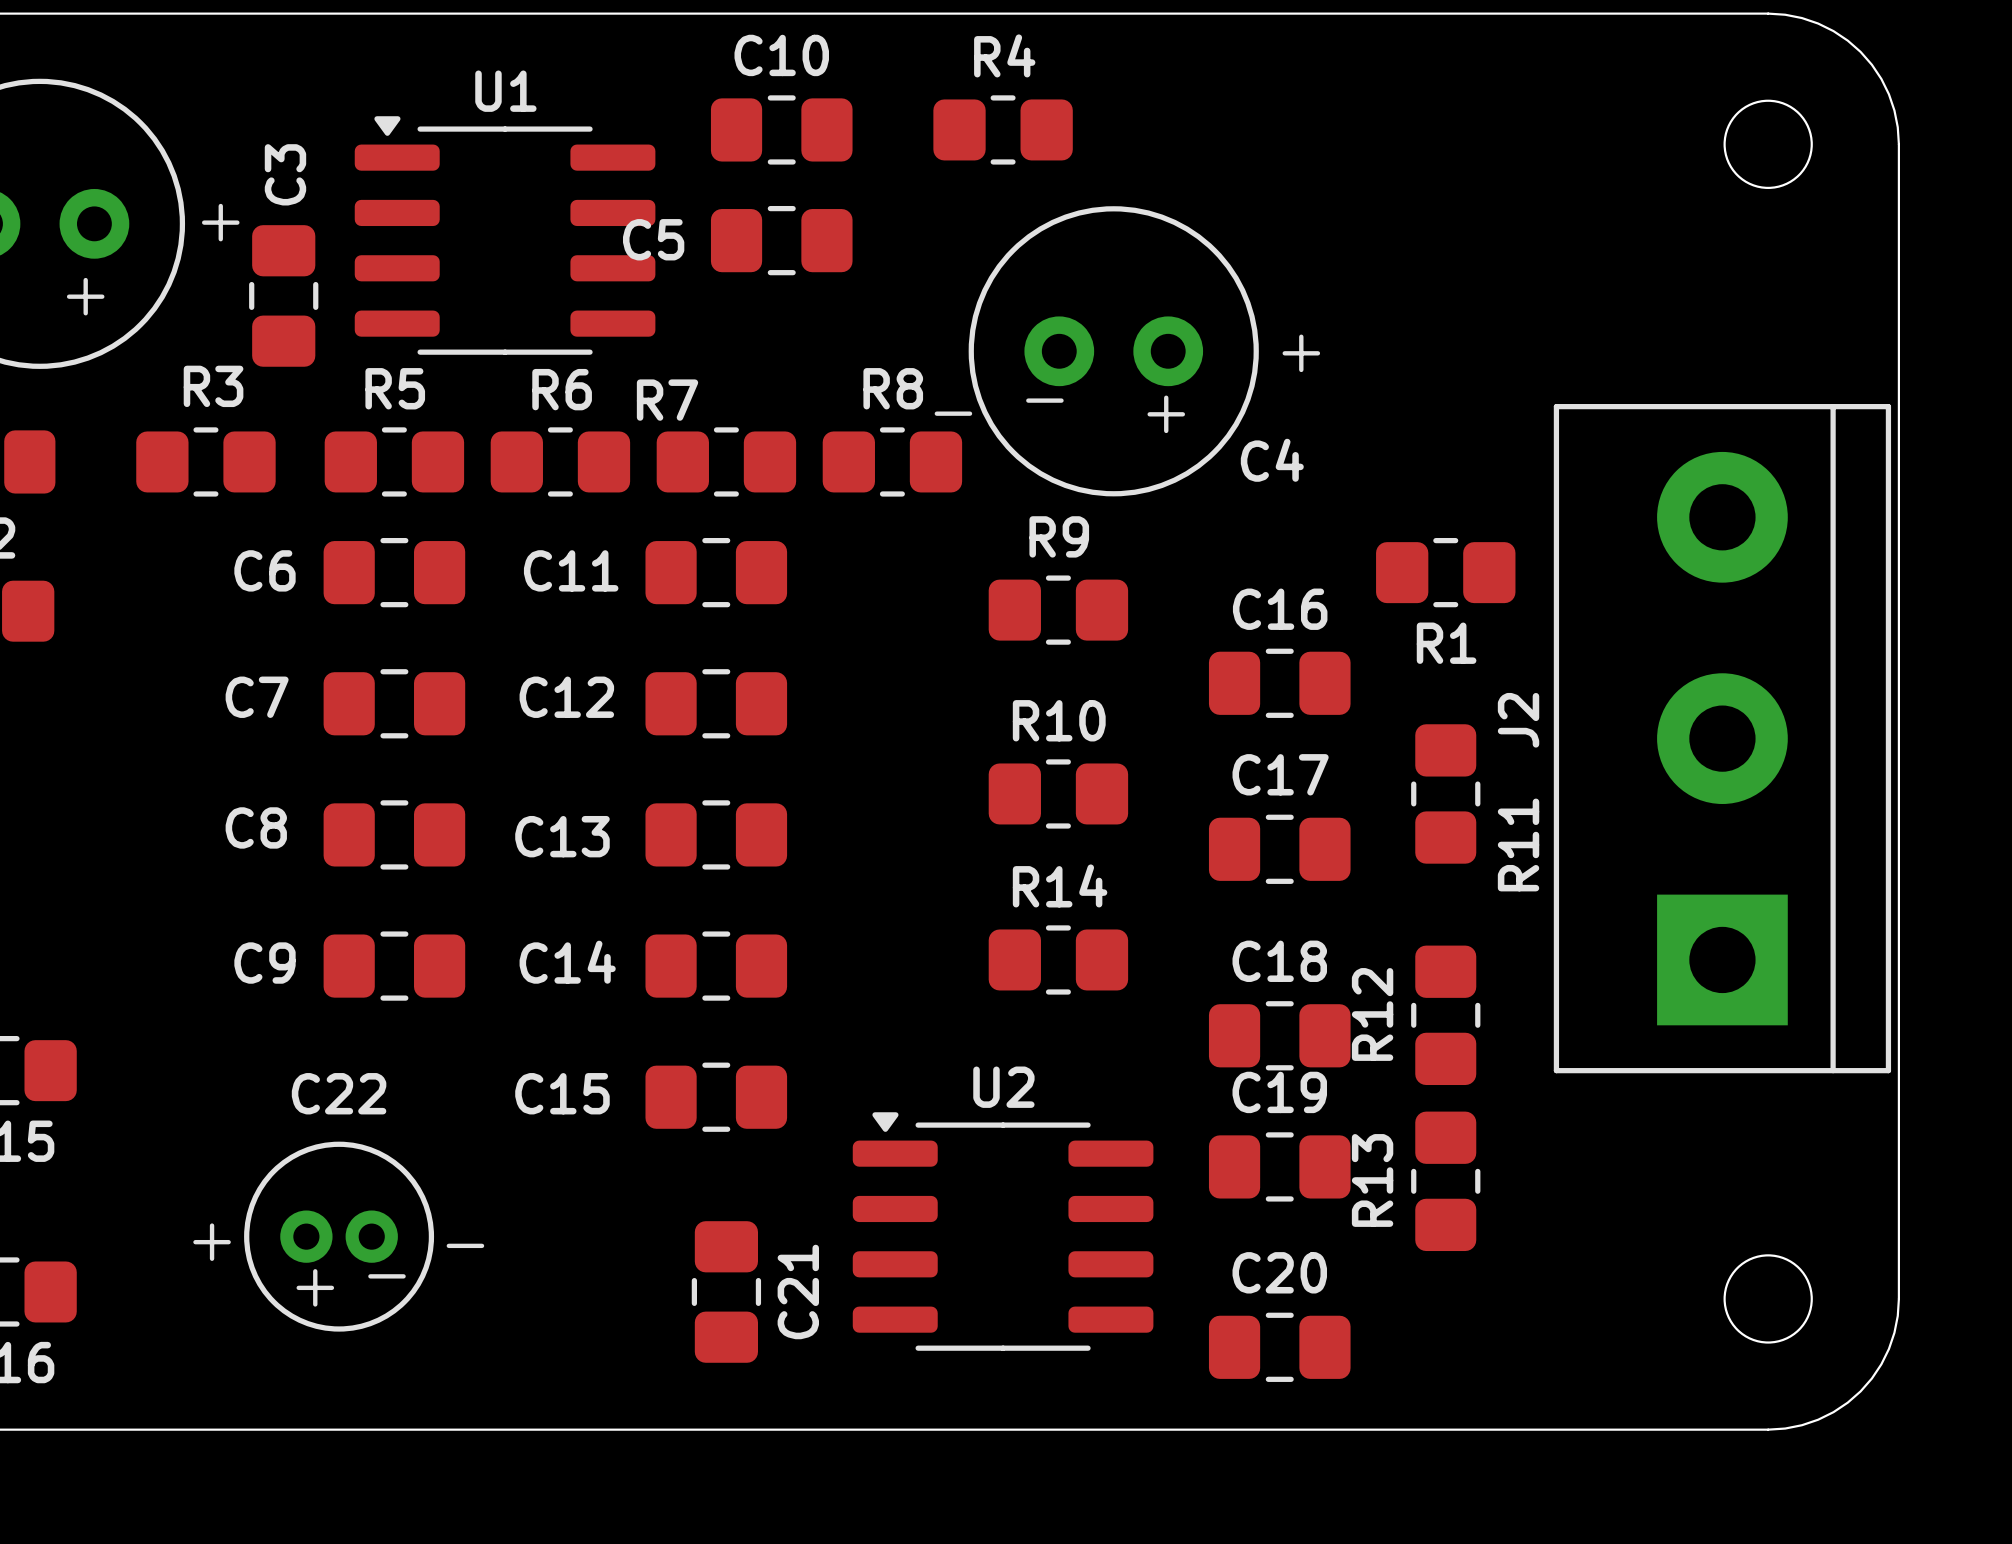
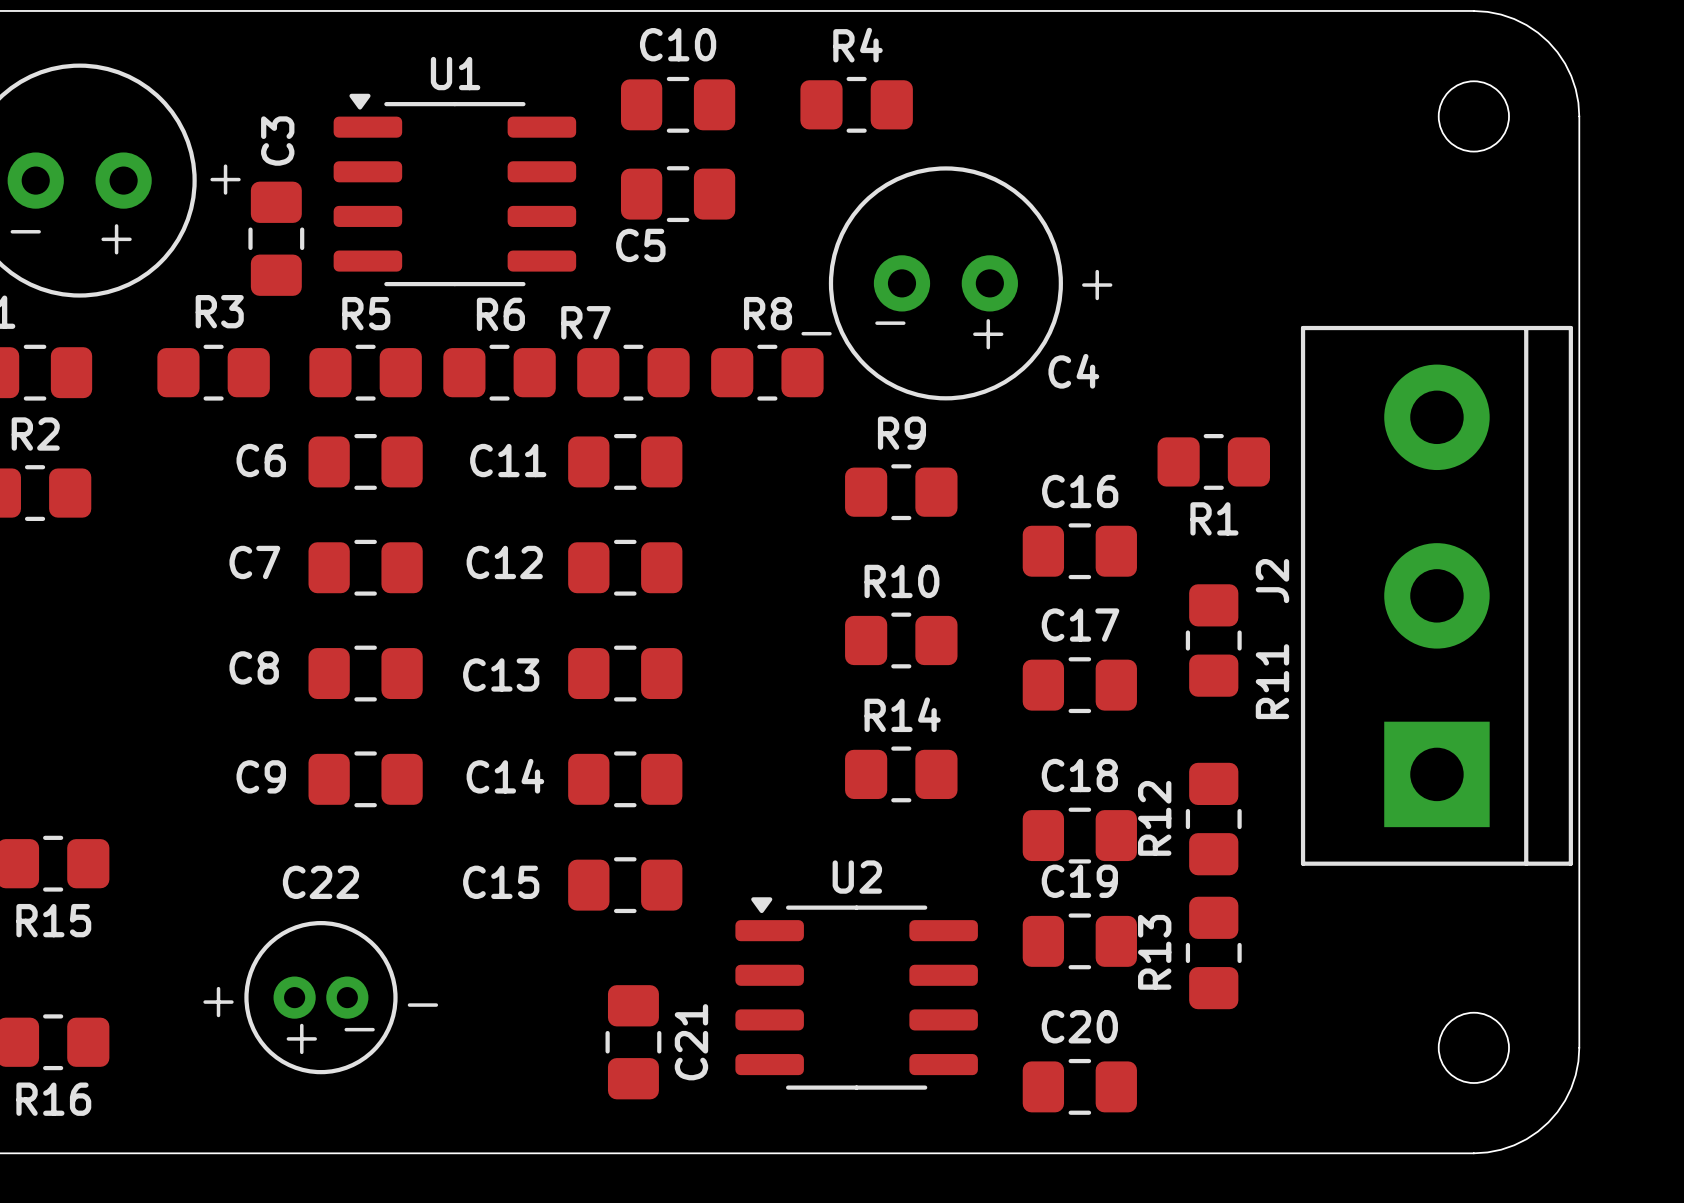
C5 name position: C5 (653, 239) -> C5 (640, 245)

